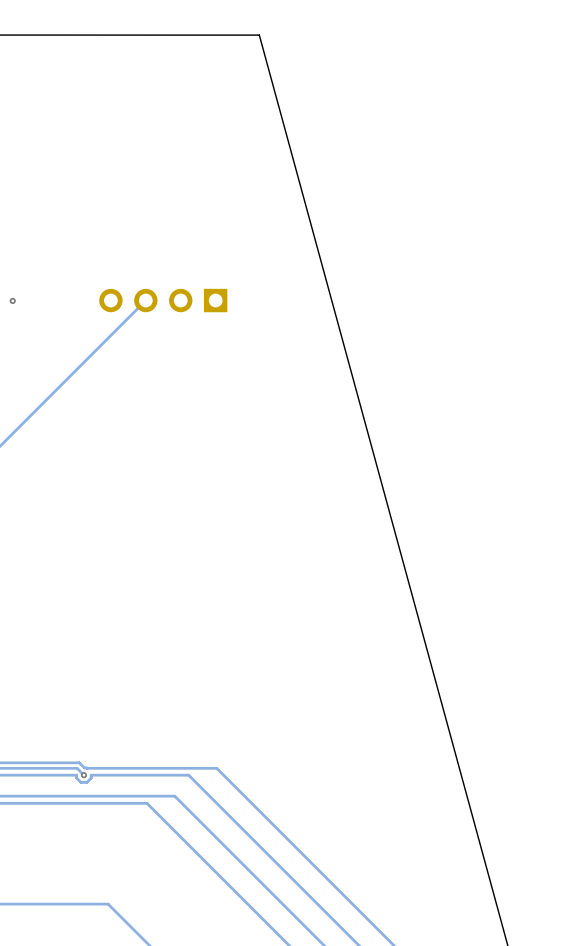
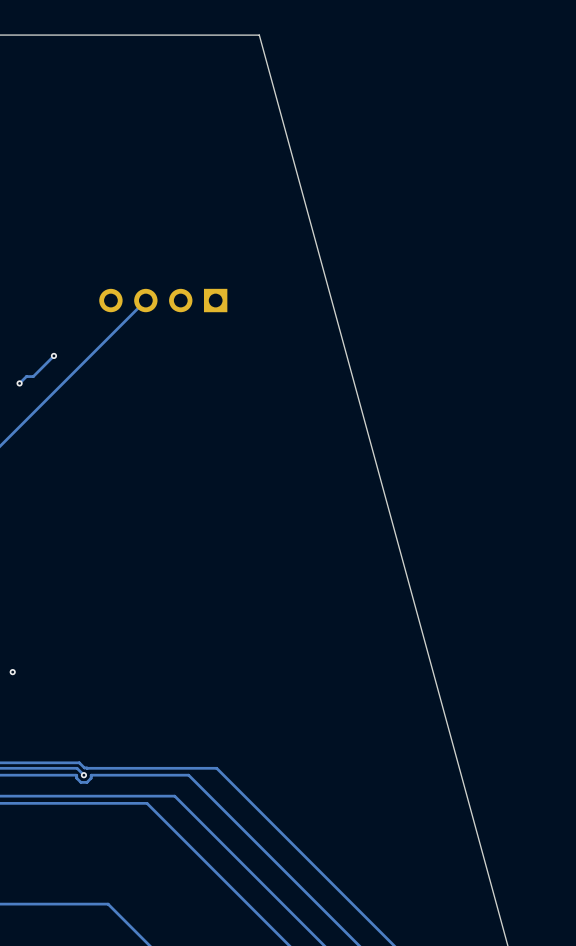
via: (12, 300) -> none
track: none -> (53, 355) (33, 376) (26, 376) (19, 383)
via: none -> (53, 355)
via: none -> (19, 383)
via: none -> (12, 672)

